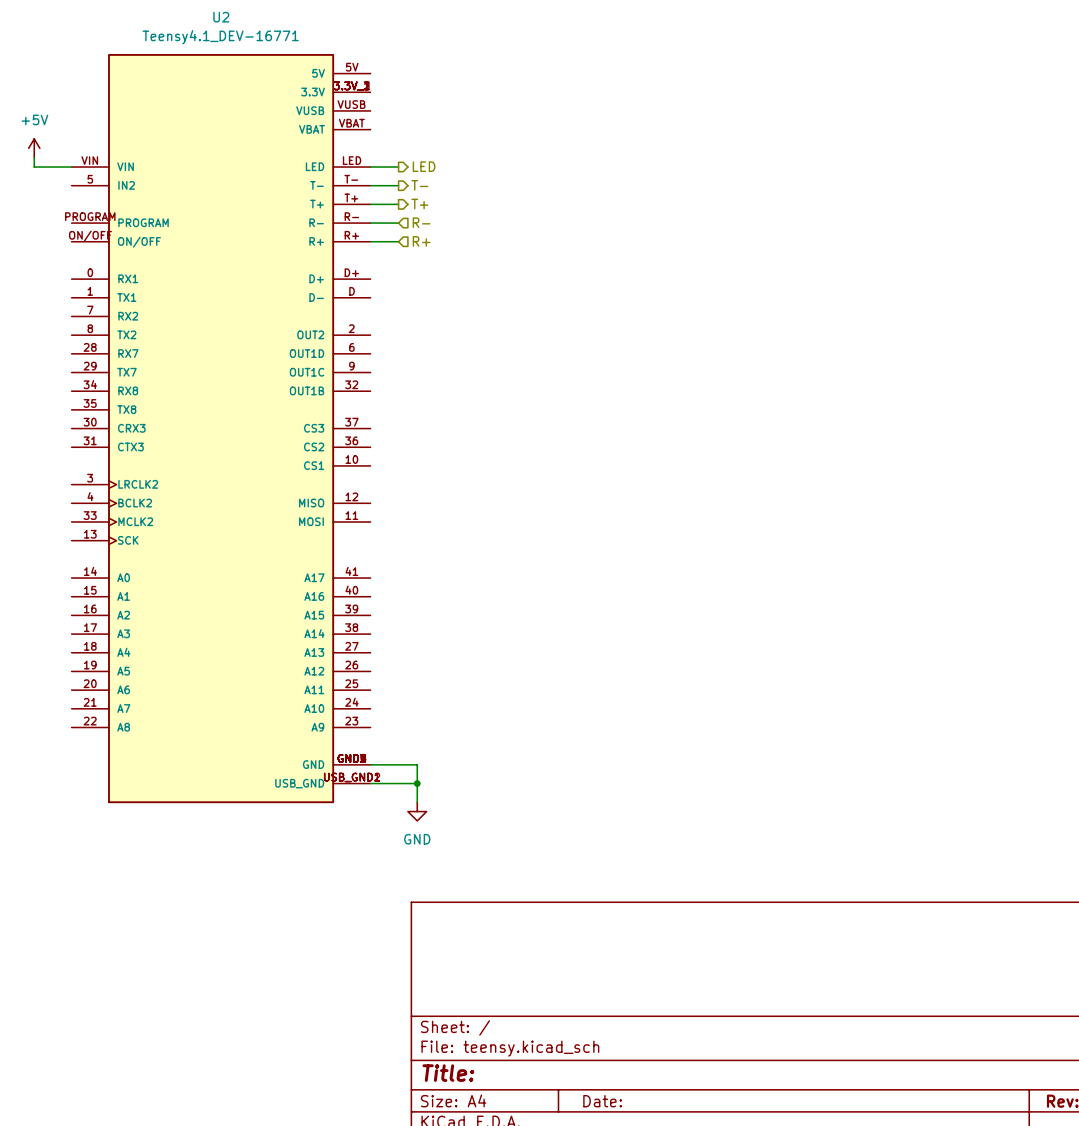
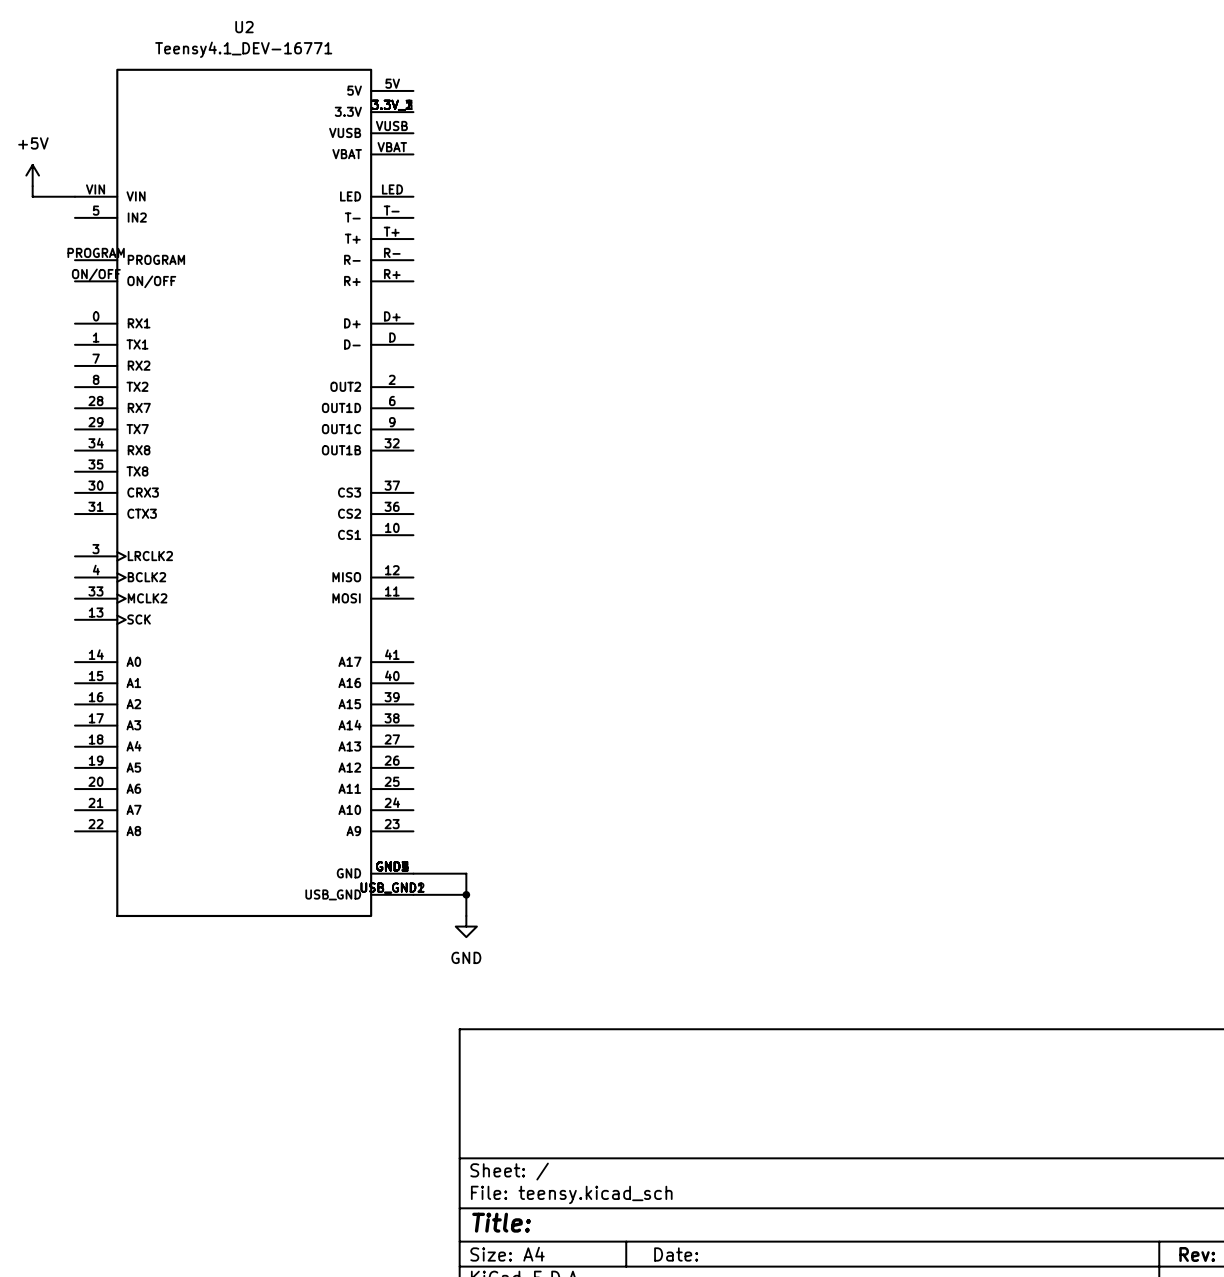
hierarchical label: LED (424, 166) -> none
wire: (370, 167) (398, 167) -> none
wire: (370, 185) (398, 185) -> none
hierarchical label: T- (419, 185) -> none
wire: (370, 204) (398, 204) -> none
hierarchical label: T+ (419, 204) -> none
hierarchical label: R- (421, 222) -> none
wire: (370, 223) (398, 223) -> none
wire: (370, 241) (398, 241) -> none
hierarchical label: R+ (421, 241) -> none

